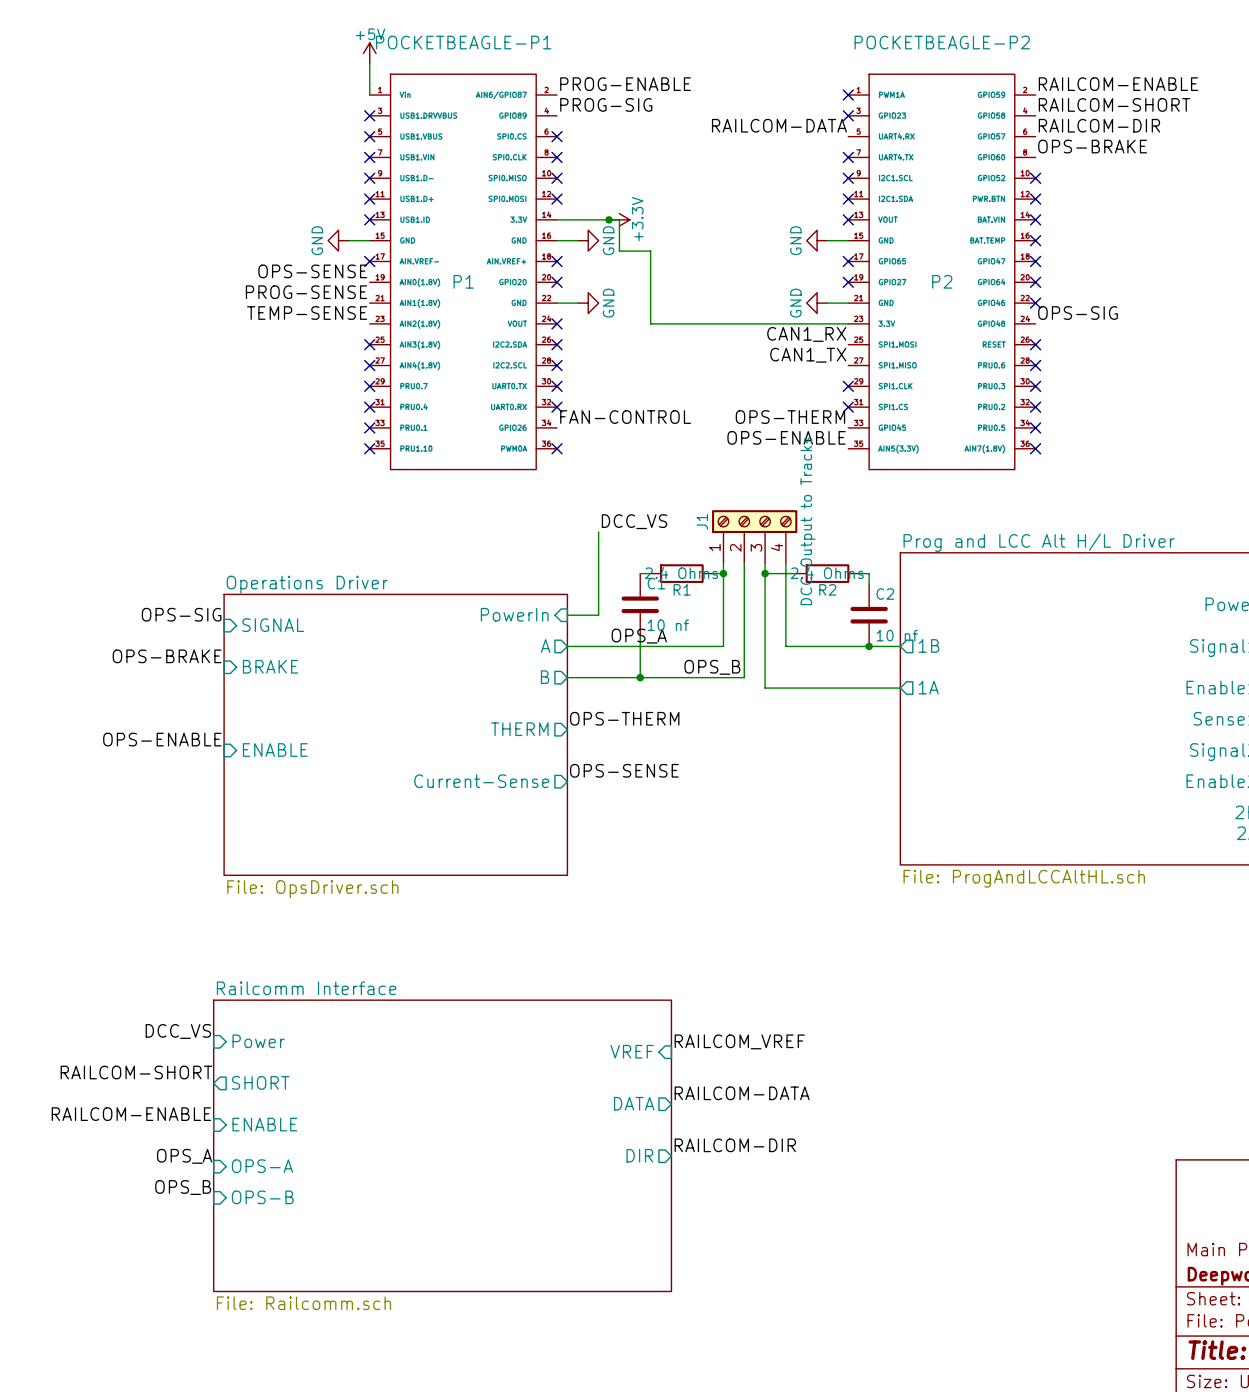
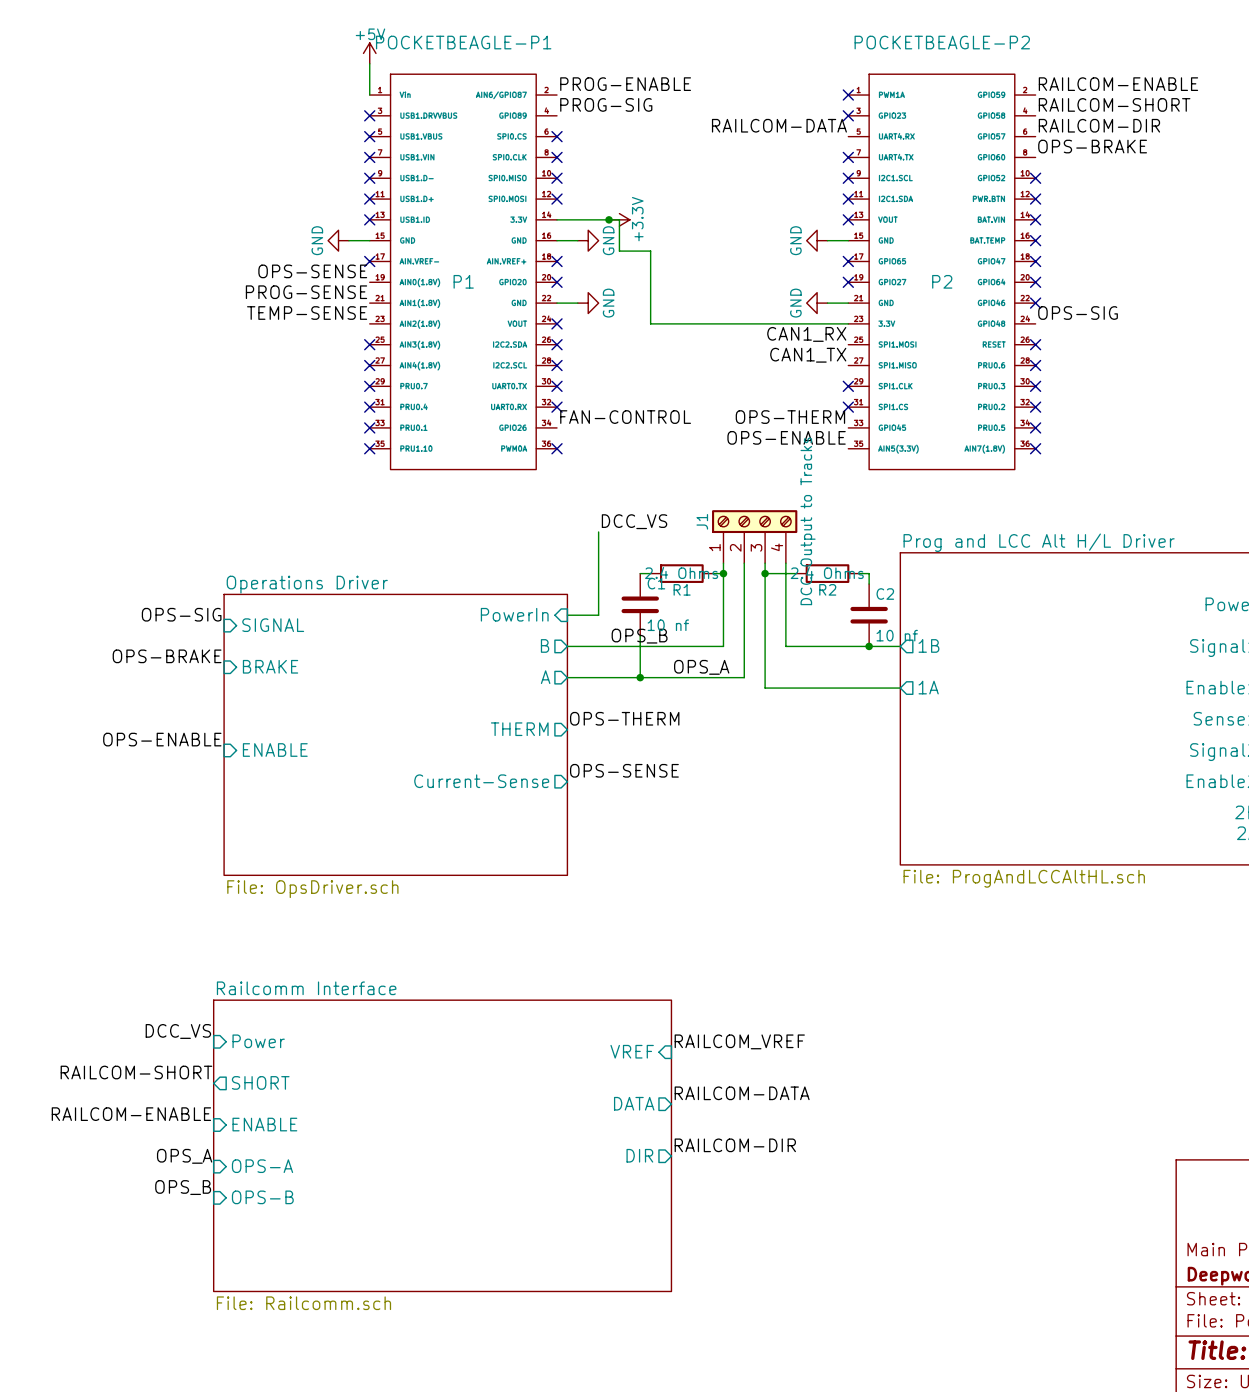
label: OPS_A (639, 636) -> OPS_B (639, 636)
sheet pin: A (545, 645) -> B (545, 645)
label: OPS_B (712, 667) -> OPS_A (701, 667)
sheet pin: B (545, 677) -> A (545, 677)

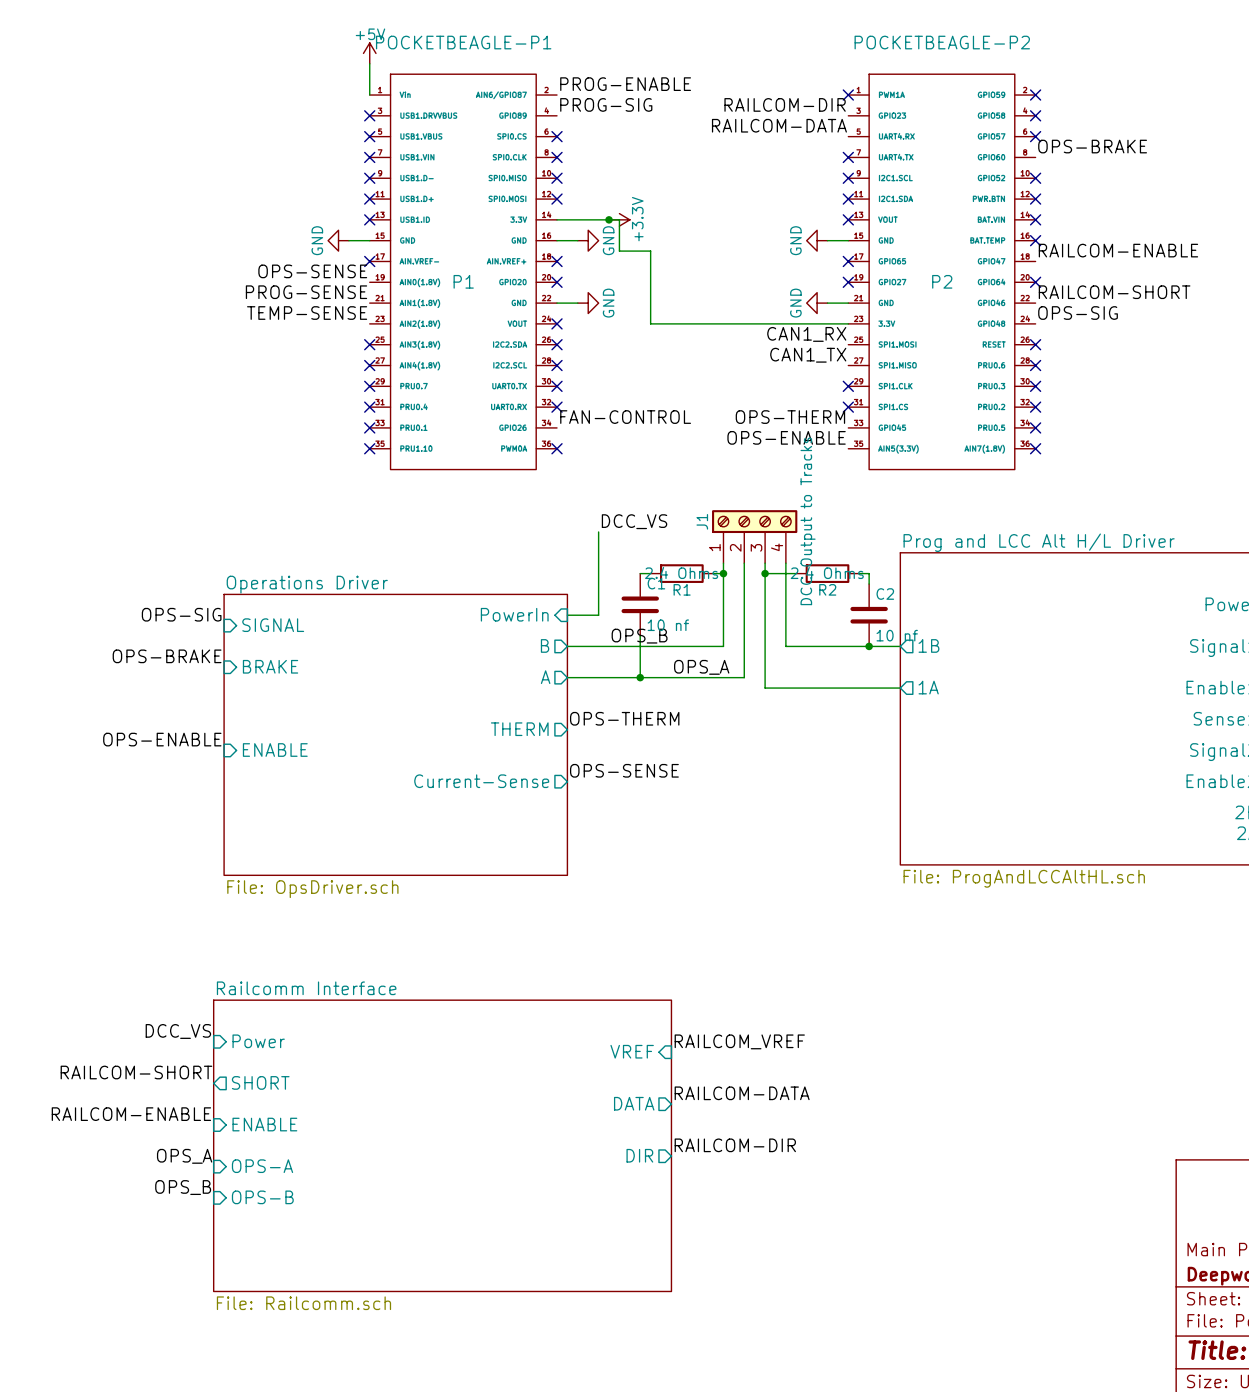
label position: RAILCOM-ENABLE (1118, 84) -> RAILCOM-ENABLE (1118, 250)
no-connect mark: none -> (1035, 95)
label position: RAILCOM-SHORT (1114, 104) -> RAILCOM-SHORT (1114, 292)
no-connect mark: (848, 115) -> none
no-connect mark: none -> (1035, 115)
label position: RAILCOM-DIR (1099, 125) -> RAILCOM-DIR (785, 104)
no-connect mark: none -> (1035, 136)
no-connect mark: (1035, 261) -> none
no-connect mark: (1035, 303) -> none

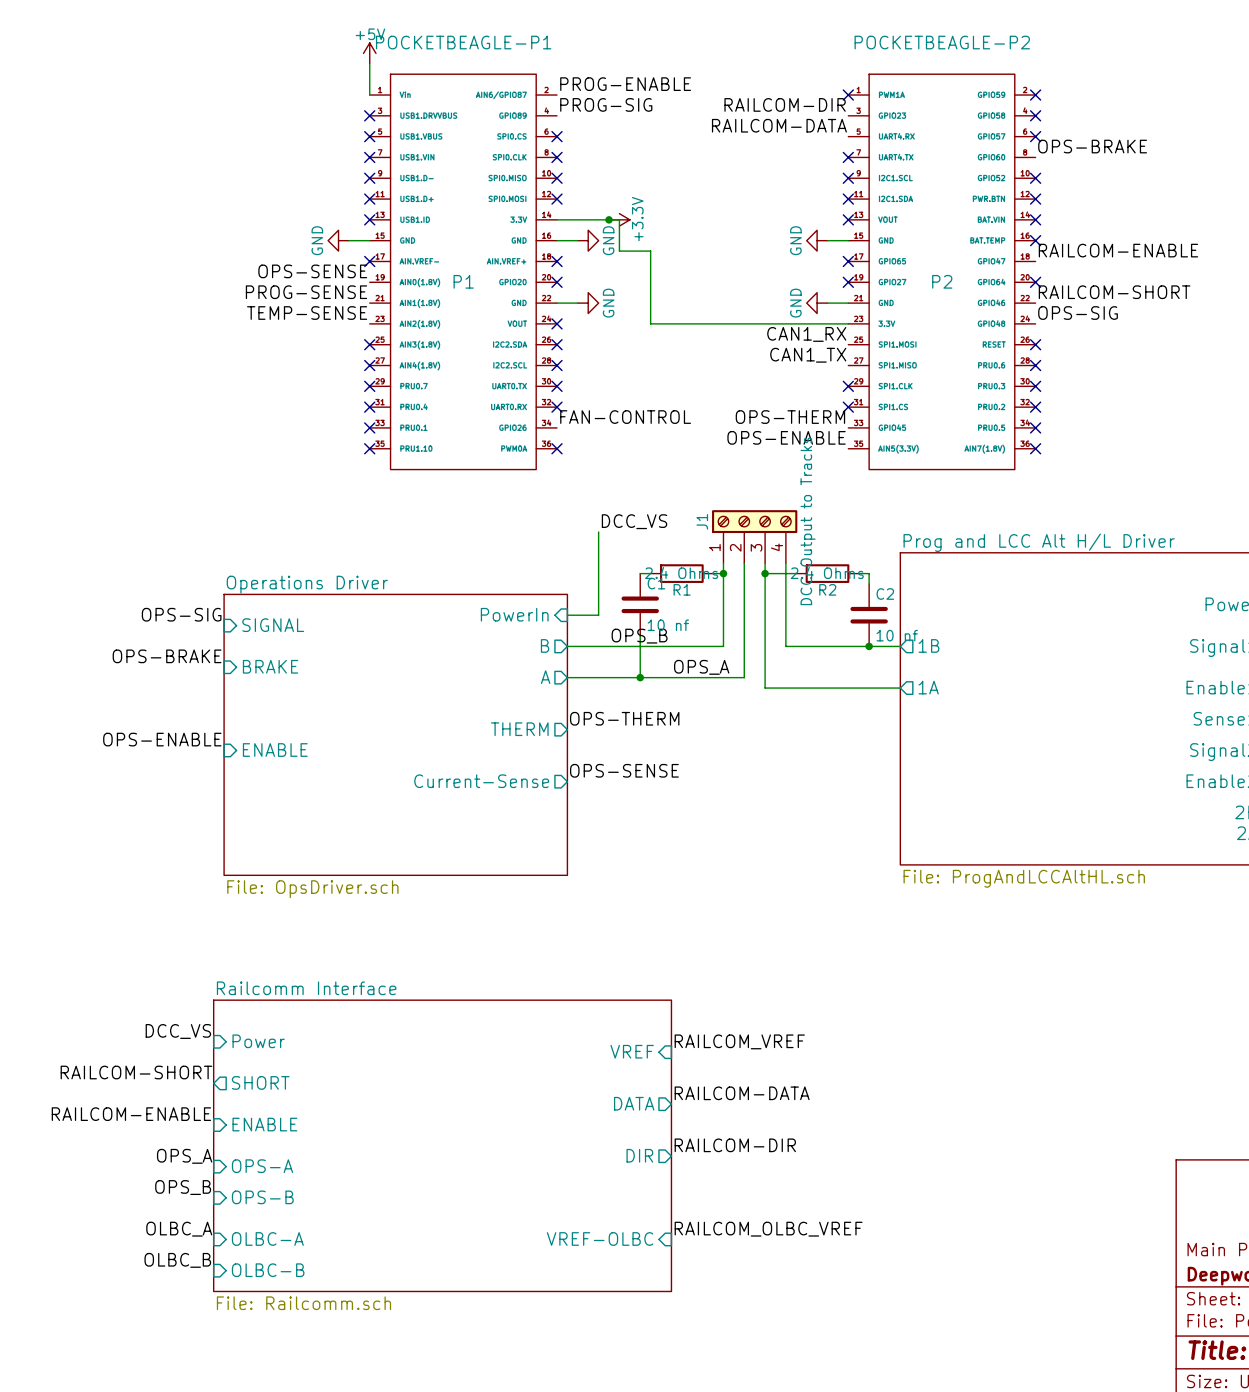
label: none -> OLBC_A (179, 1229)
label: none -> RAILCOM_OLBC_VREF (768, 1229)
sheet pin: none -> OLBC-A (267, 1238)
sheet pin: none -> VREF-OLBC (600, 1238)
label: none -> OLBC_B (177, 1260)
sheet pin: none -> OLBC-B (268, 1270)

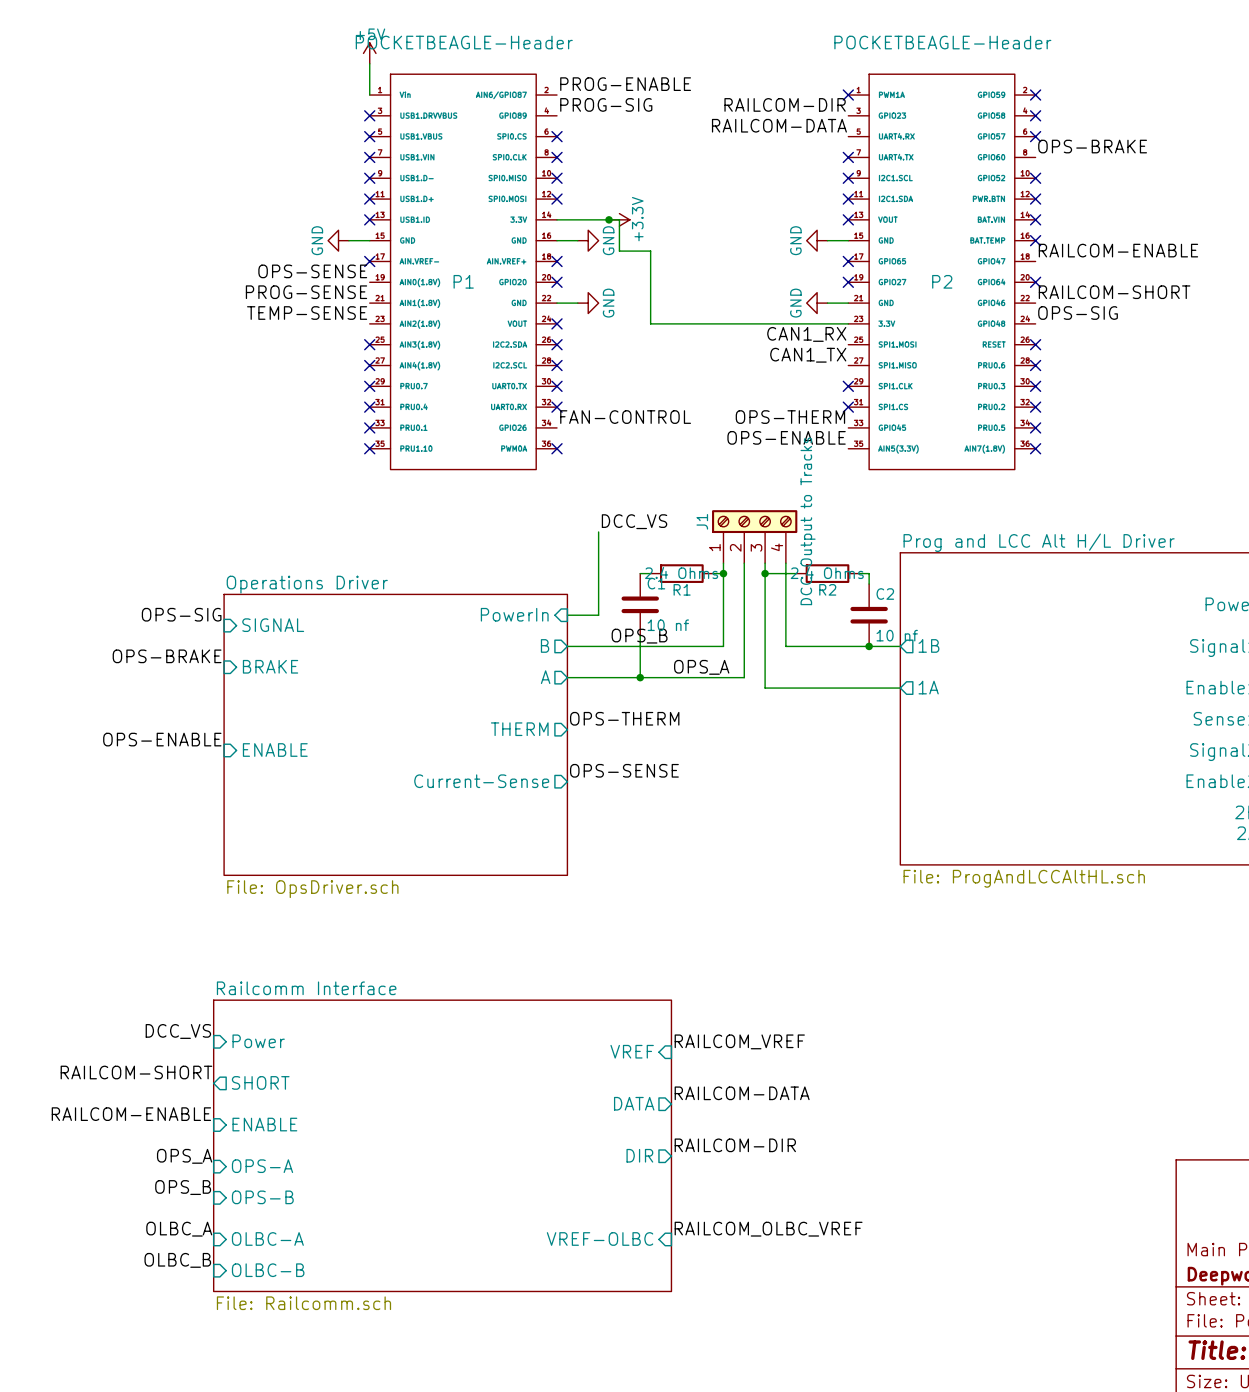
P1 value: POCKETBEAGLE-P1 (463, 42) -> POCKETBEAGLE-Header (464, 42)
P2 value: POCKETBEAGLE-P2 (942, 42) -> POCKETBEAGLE-Header (942, 42)

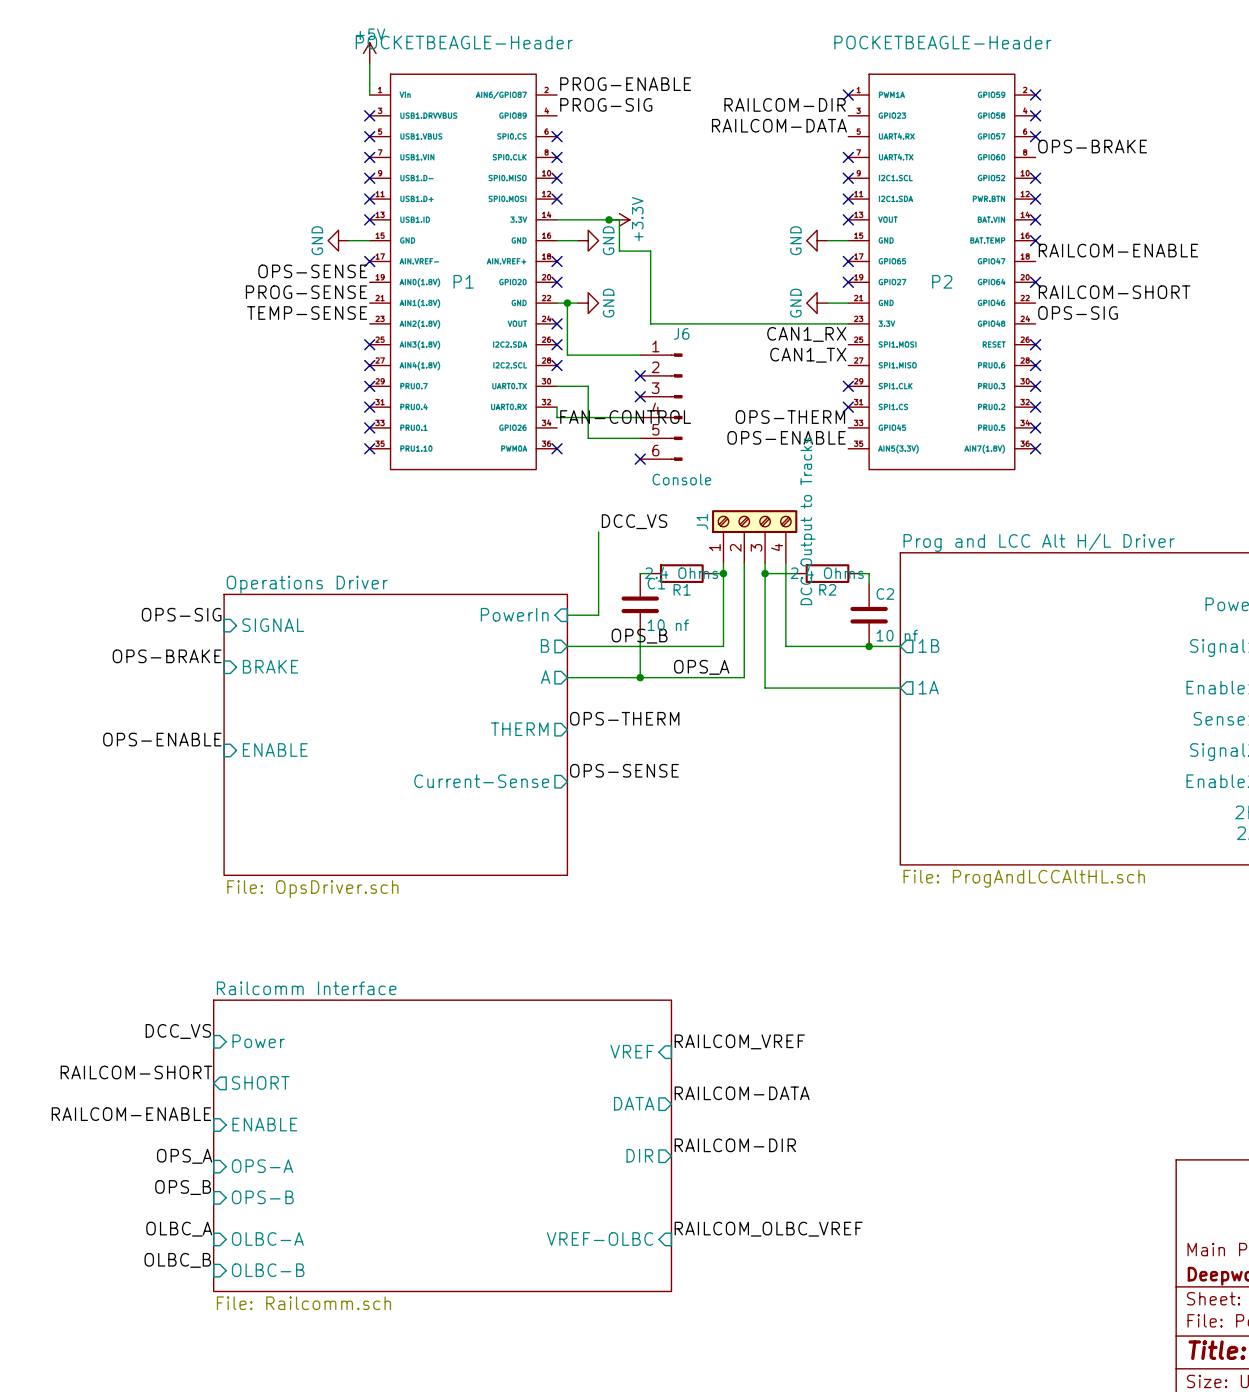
wire: none -> (567, 303) (567, 355) (640, 355)
junction: none -> (567, 303)
no-connect mark: none -> (640, 375)
wire: none -> (557, 386) (588, 386) (588, 438) (640, 438)
no-connect mark: (557, 386) -> none
no-connect mark: none -> (640, 396)
wire: none -> (557, 407) (557, 417) (640, 417)
no-connect mark: (557, 407) -> none
J6: none -> Console (661, 407)
no-connect mark: none -> (640, 459)

